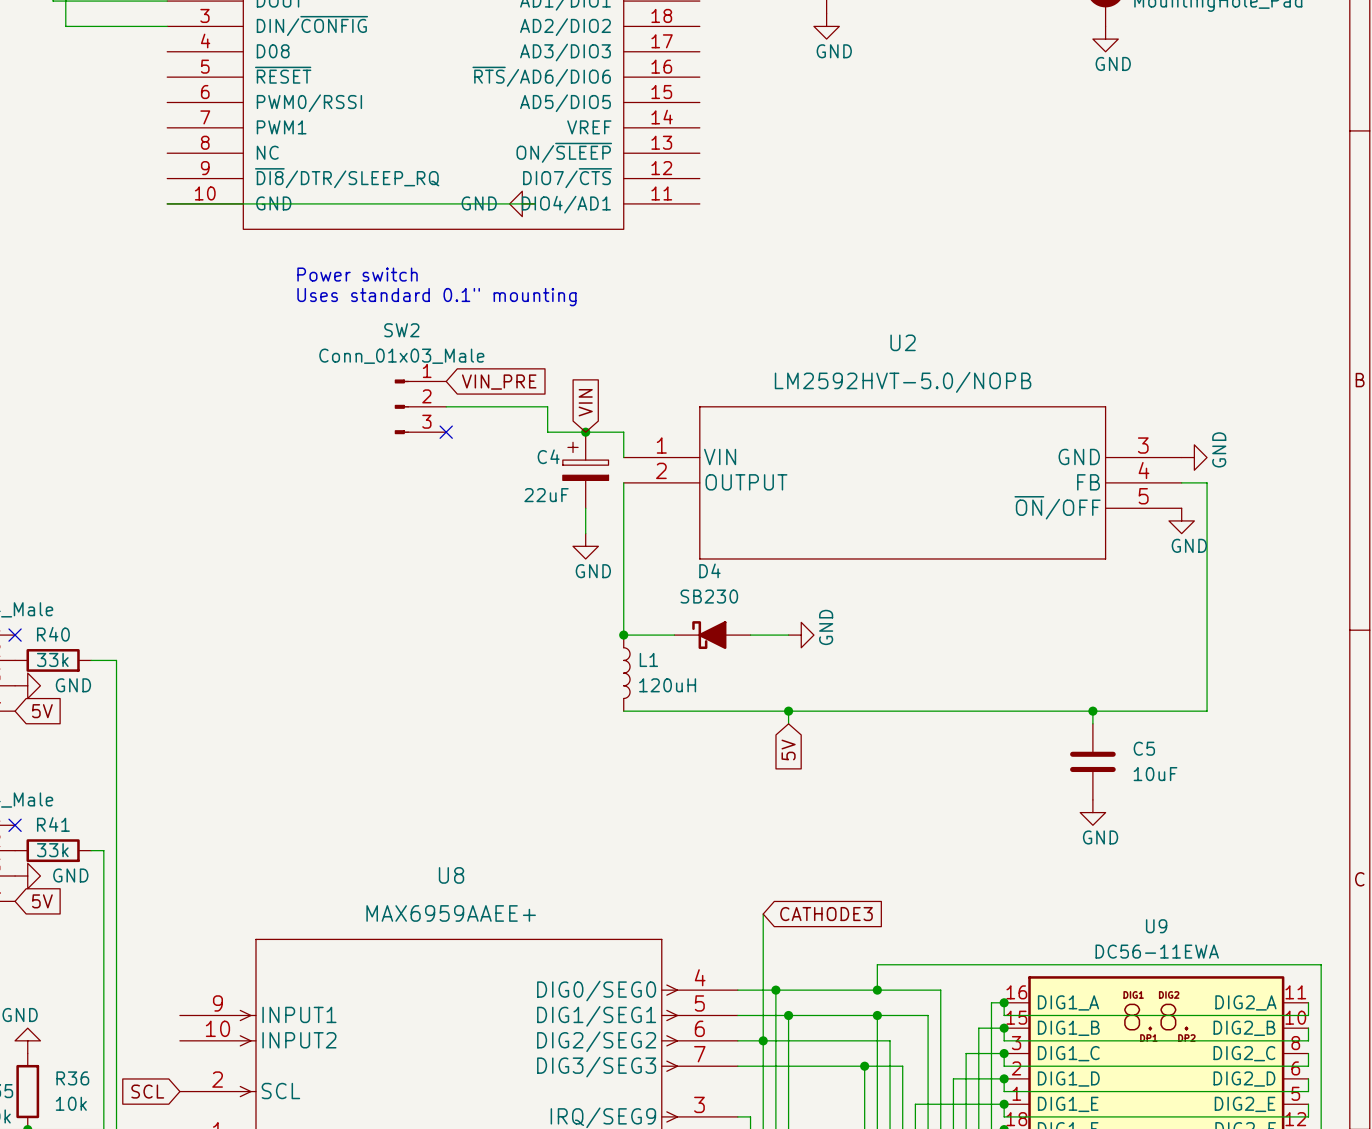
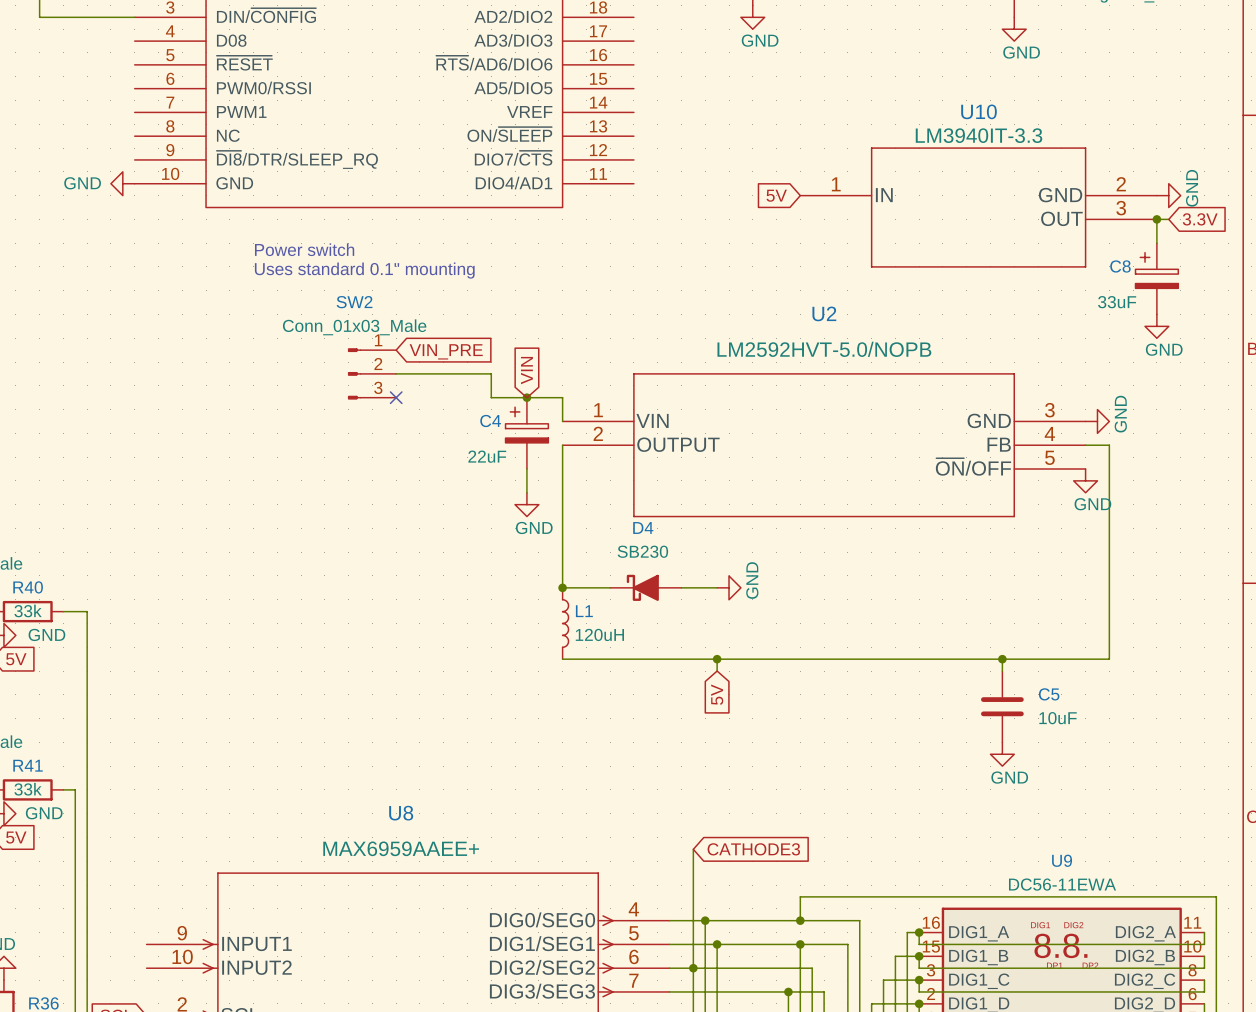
power symbol: none -> GND (122, 183)
wire: (167, 203) (534, 203) -> none
power symbol: GND (522, 203) -> none
global label: none -> 5V (776, 195)
power symbol: none -> GND (1168, 195)
U10: none -> LM3940IT-3.3 (978, 207)
junction: none -> (1156, 219)
wire: none -> (1168, 219) (1156, 219) (1156, 243)
global label: none -> 3.3V (1200, 219)
C8: none -> 33uF (1156, 278)
power symbol: none -> GND (1156, 326)

